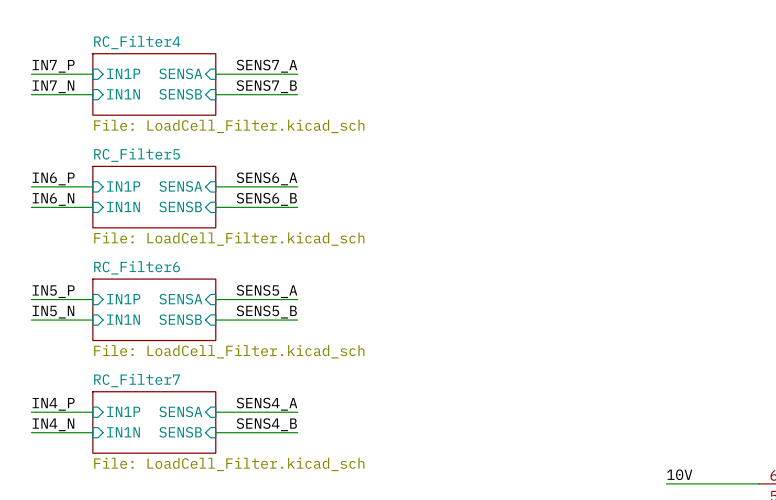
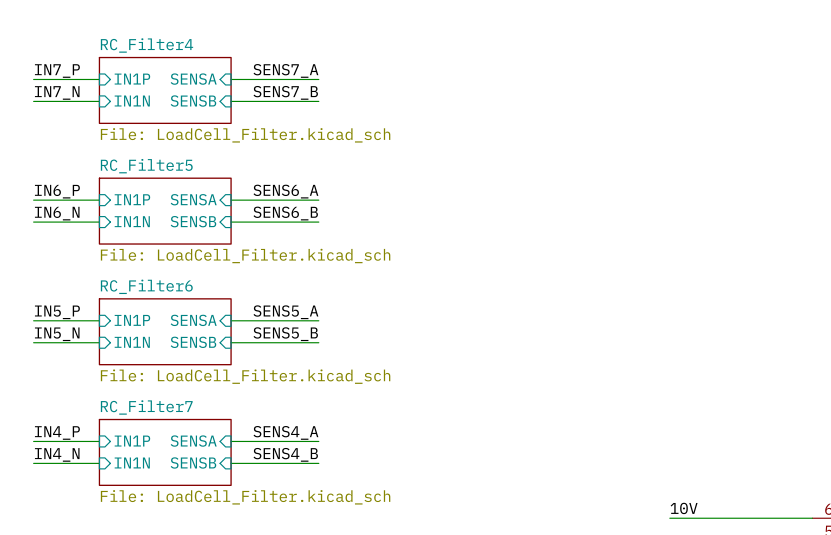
label position: 10V (679, 474) -> 10V (684, 508)
wire: none -> (669, 518) (713, 518)

